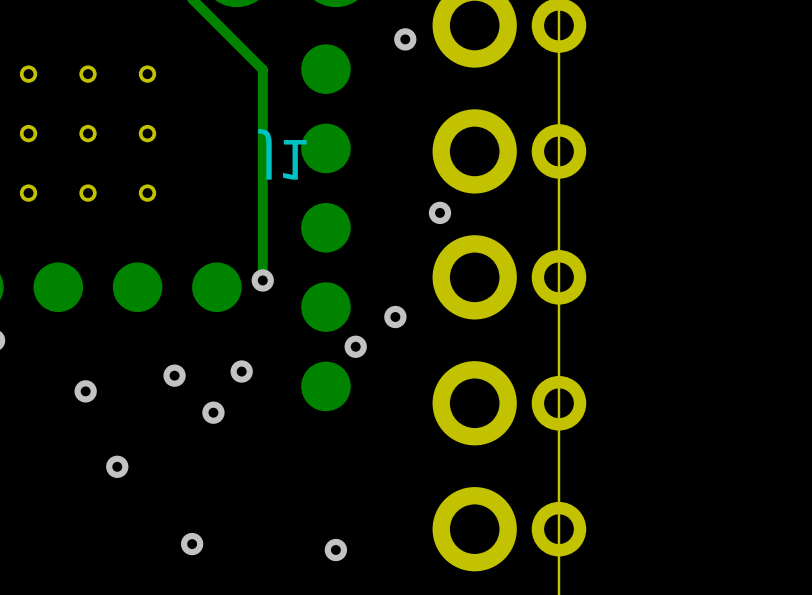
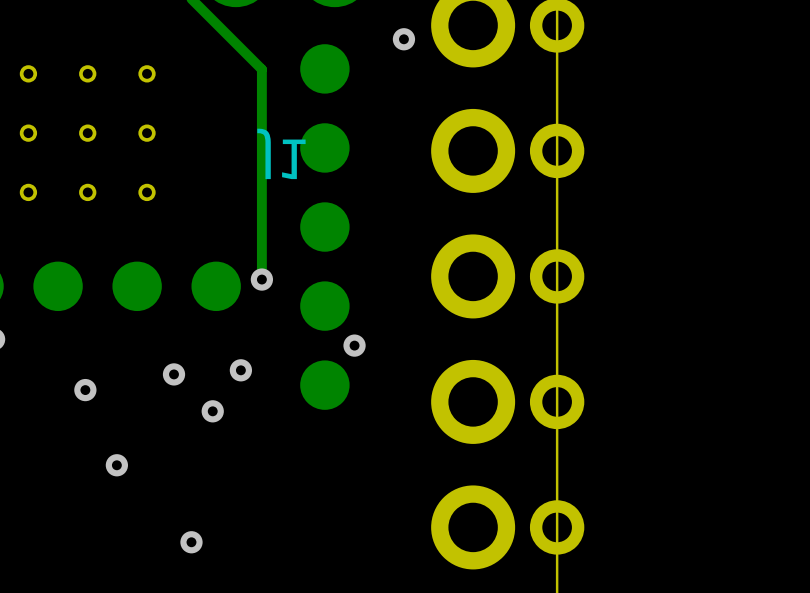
via: (439, 212) -> none
via: (395, 317) -> none
via: (335, 550) -> none

